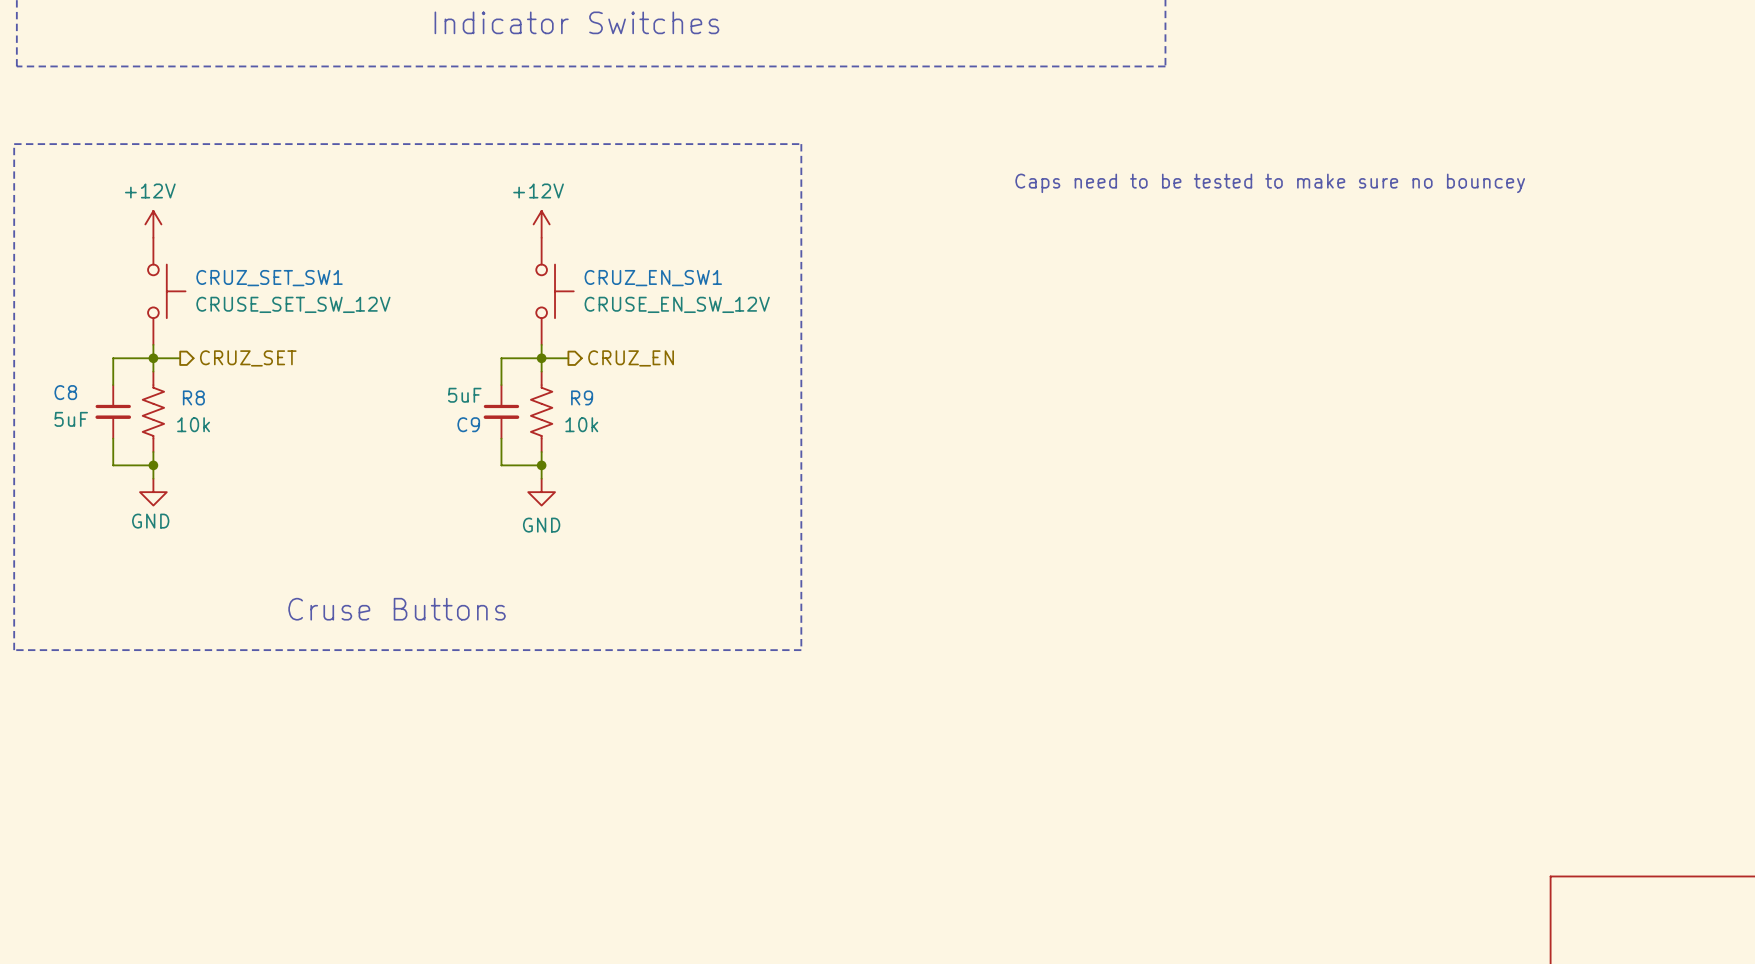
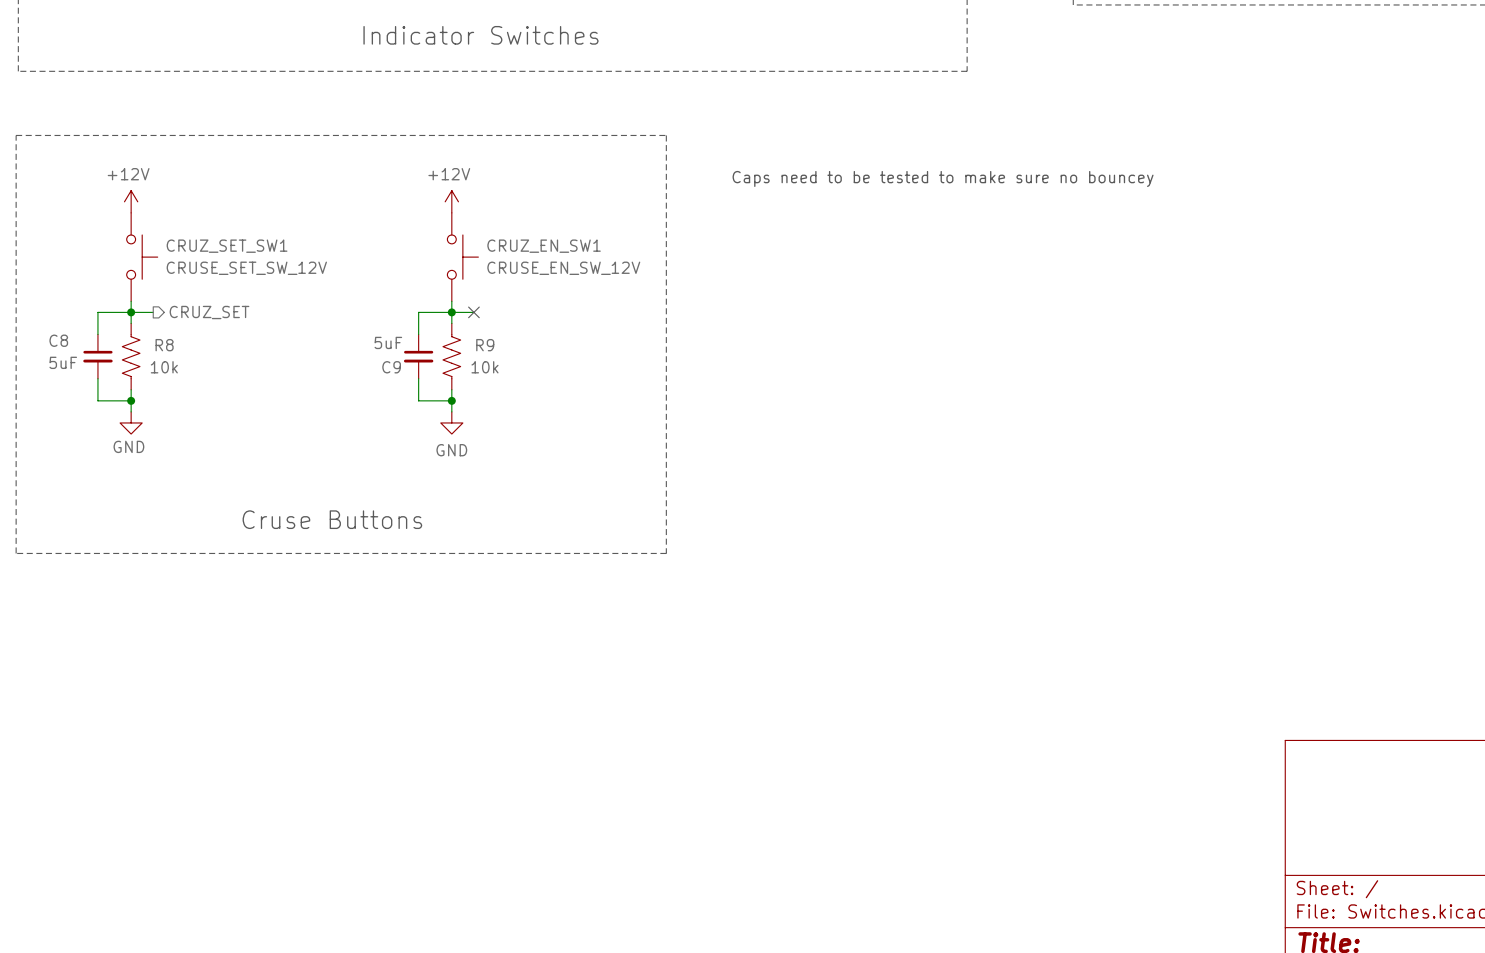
text position: Caps need to be tested to make sure no bouncey (1270, 183) -> Caps need to be tested to make sure no bouncey (943, 178)
no-connect mark: none -> (473, 312)
hierarchical label: CRUZ_EN (631, 358) -> none

